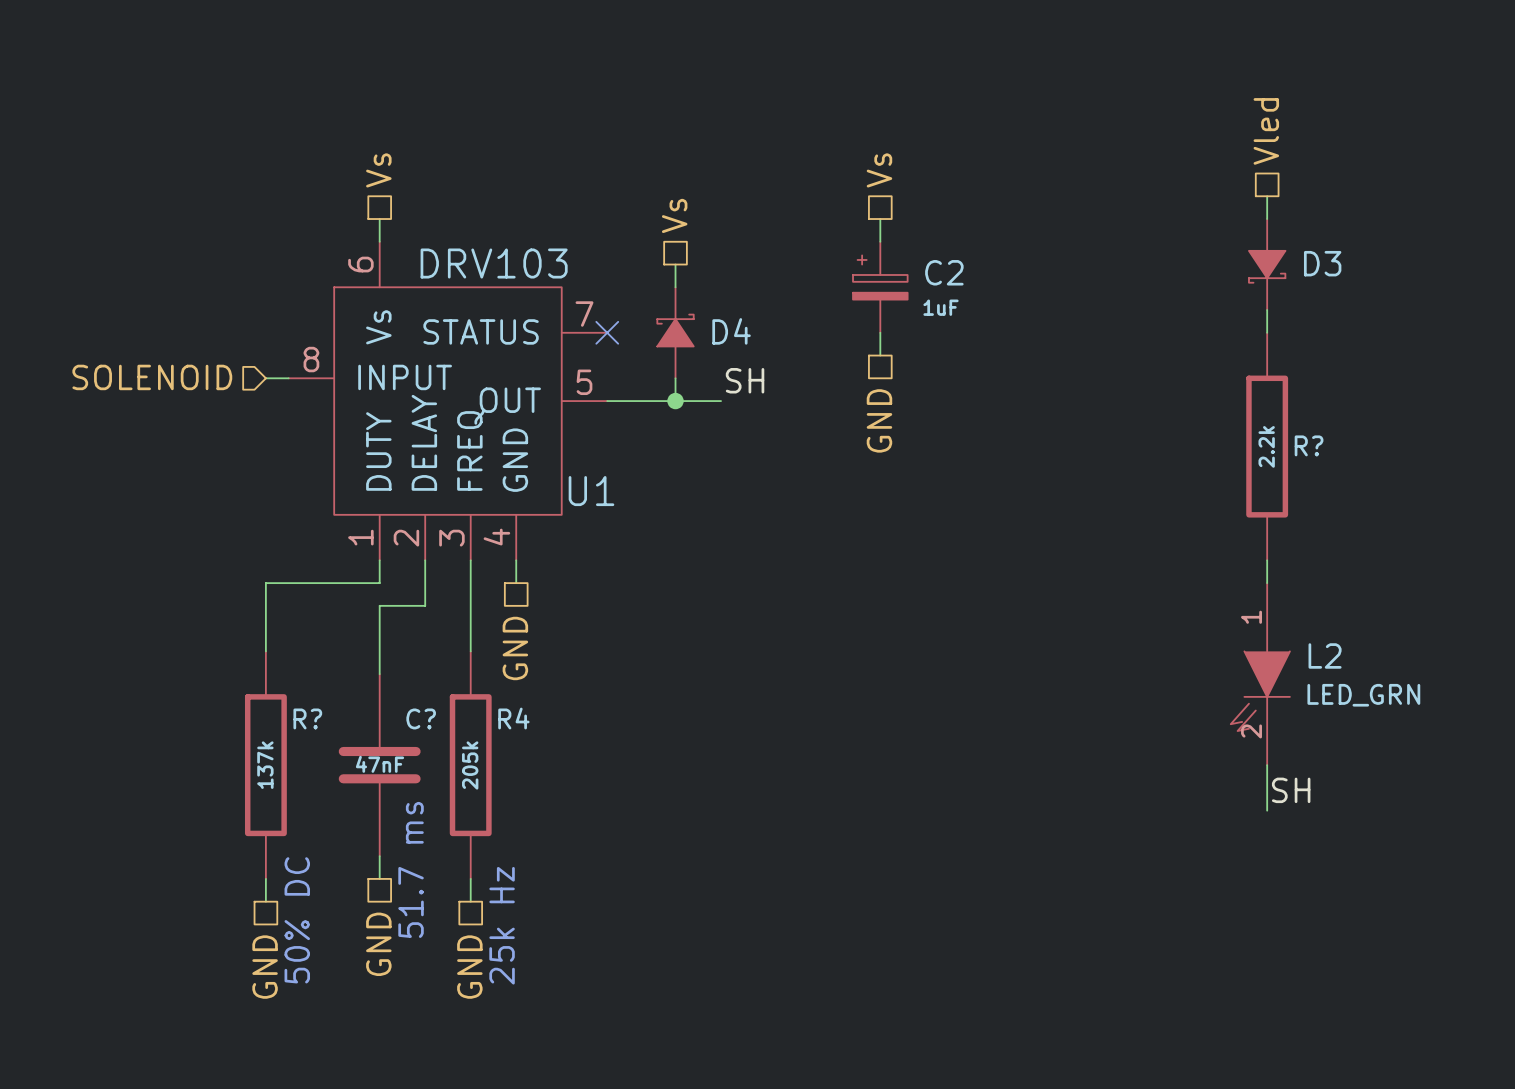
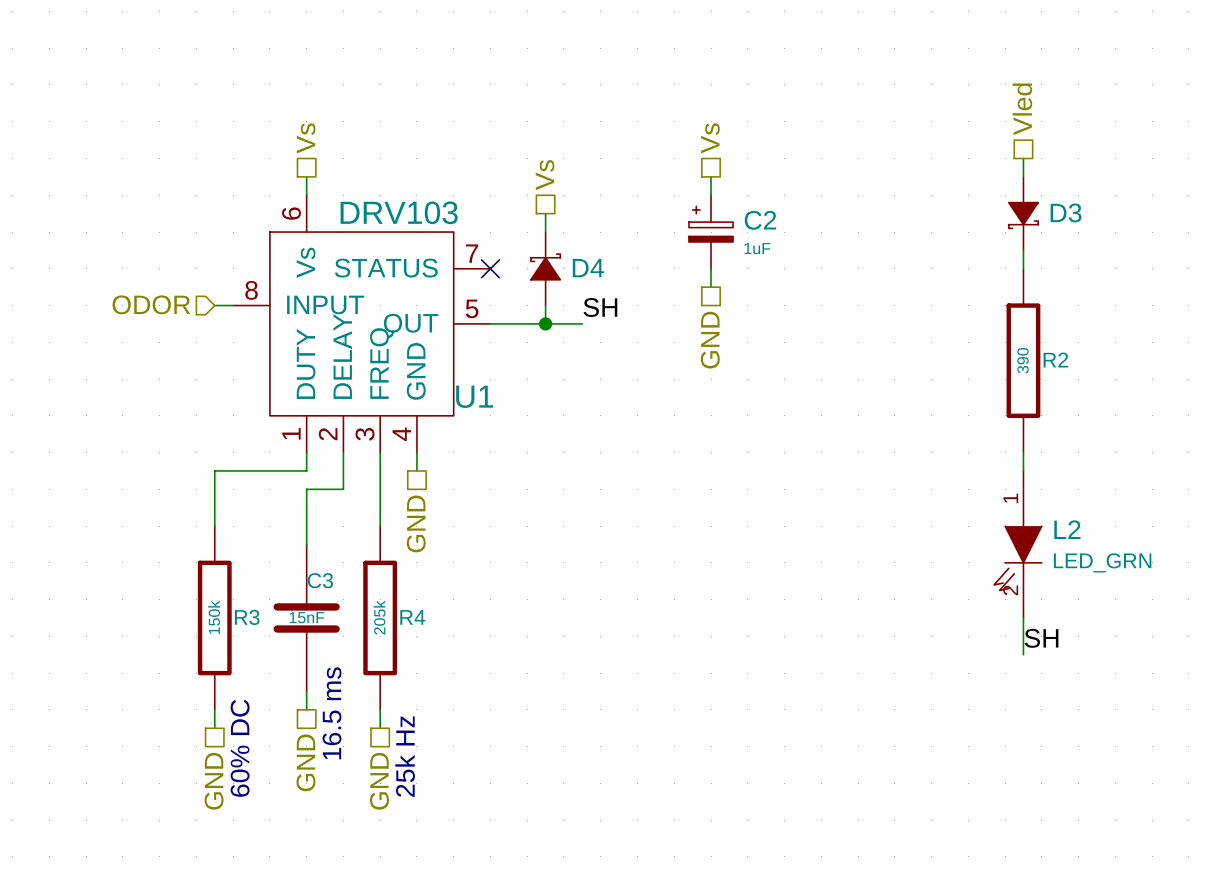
hierarchical label: SOLENOID (152, 377) -> ODOR (151, 304)
R? name: R? (1309, 445) -> R2 (1055, 360)
R? value: 2.2k (1266, 446) -> 390 (1023, 360)
R? name: R? (307, 718) -> R3 (247, 617)
C? name: C? (421, 718) -> C3 (320, 580)
R4 name position: R4 (513, 718) -> R4 (412, 617)
C? value: 47nF (380, 764) -> 15nF (306, 617)
R? value: 137k (265, 765) -> 150k (214, 617)
text: 51.7 ms (411, 869) -> 16.5 ms (331, 713)
text: 50% DC (297, 920) -> 60% DC (240, 748)

